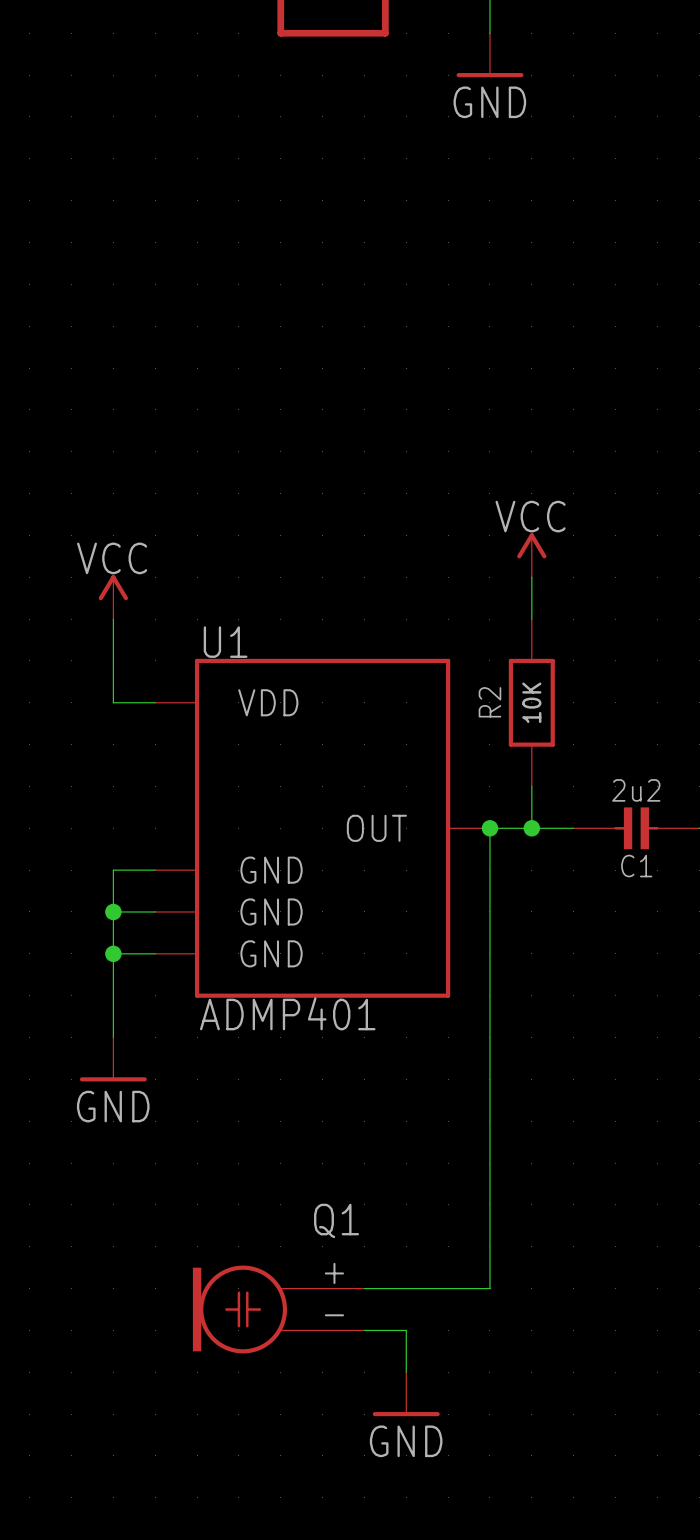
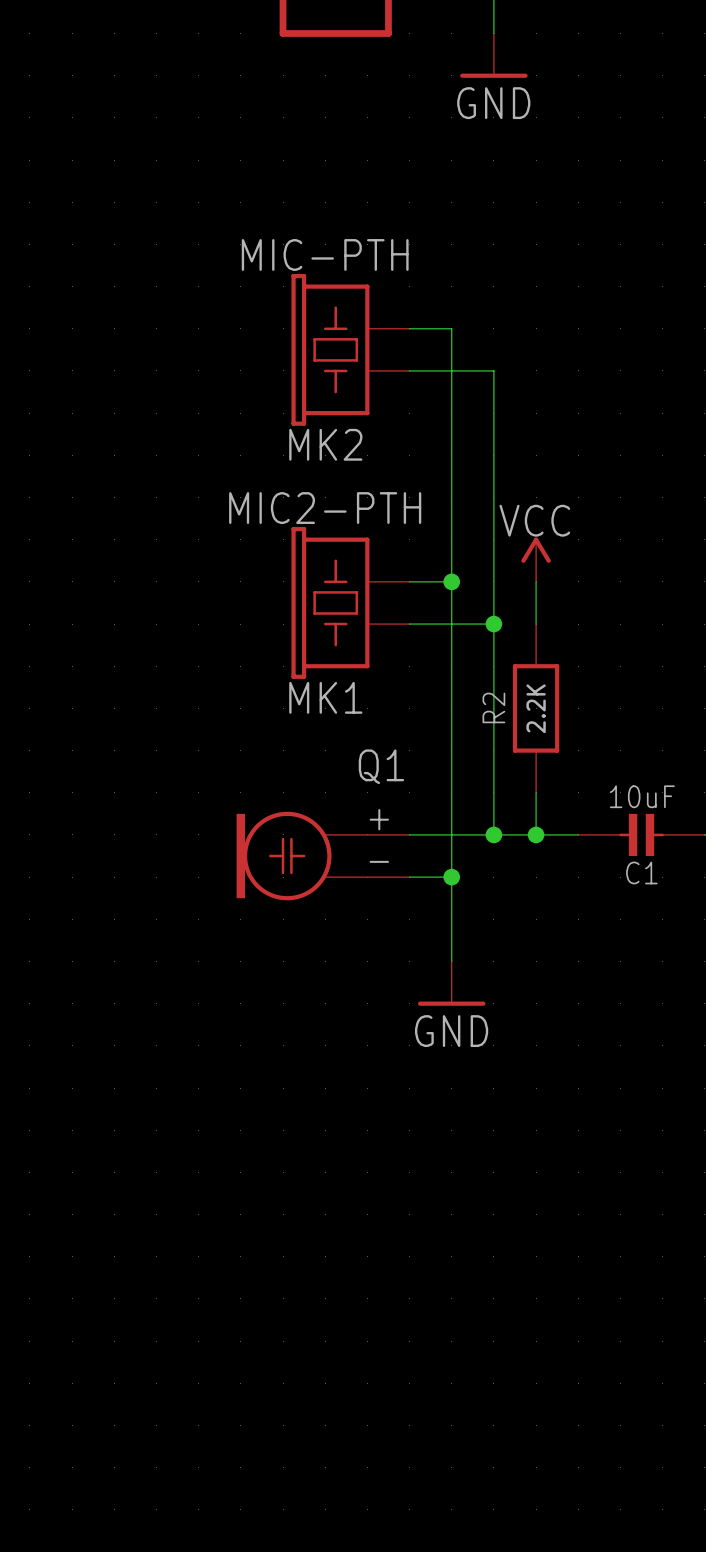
wire: none -> (409, 328) (451, 328) (451, 961)
MK2: none -> MIC-PTH (350, 349)
wire: none -> (409, 370) (493, 370) (493, 834) (409, 834)
wire: none -> (409, 581) (451, 581)
junction: none -> (451, 581)
power symbol: VCC (113, 597) -> none
MK1: none -> MIC2-PTH (350, 602)
wire: (113, 619) (113, 702) (155, 702) -> none
wire: none -> (409, 624) (493, 624)
junction: none -> (493, 624)
R2 value: 10K (531, 702) -> 2.2K (536, 708)
C1 value: 2u2 (636, 790) -> 10uF (642, 796)
U1: ADMP401 (322, 828) -> none
wire: (489, 828) (489, 1288) (364, 1288) -> none
wire: (155, 870) (113, 870) (113, 1037) -> none
junction: none -> (451, 877)
wire: (113, 911) (155, 911) -> (409, 877) (451, 877)
junction: (113, 911) -> none
wire: (113, 953) (155, 953) -> none
junction: (113, 953) -> none
power symbol: none -> GND (451, 983)
power symbol: GND (113, 1059) -> none
Q1 position: (278, 1309) -> (323, 856)
wire: (364, 1330) (406, 1330) (406, 1372) -> none
power symbol: GND (406, 1394) -> none

